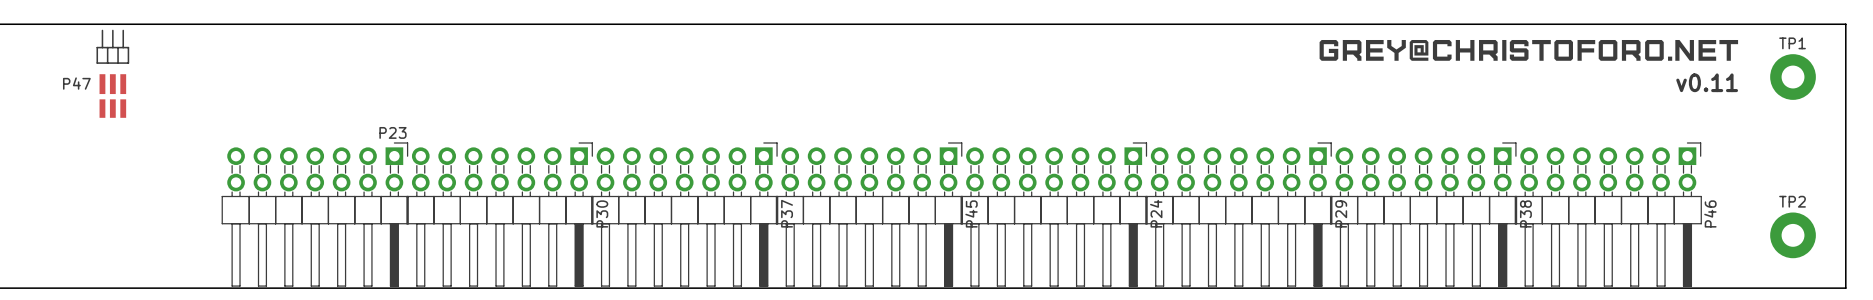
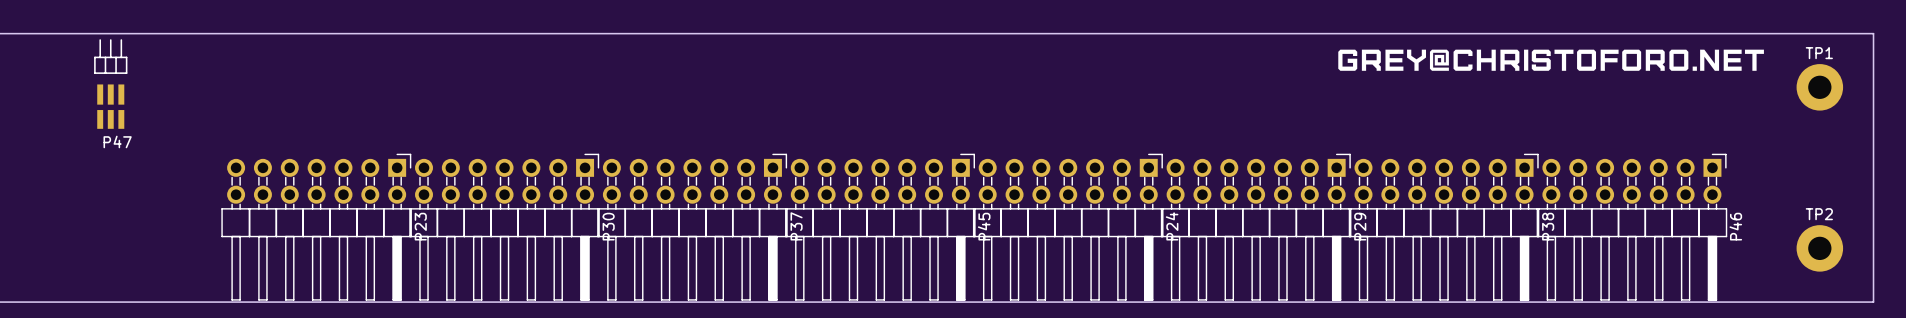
text: v0.11 (1707, 82) -> none
P47 name position: P47 (76, 83) -> P47 (117, 141)
P23 name rotation: 0° (392, 132) -> 90° counterclockwise (420, 226)
P23 name position: P23 (392, 132) -> P23 (420, 226)

